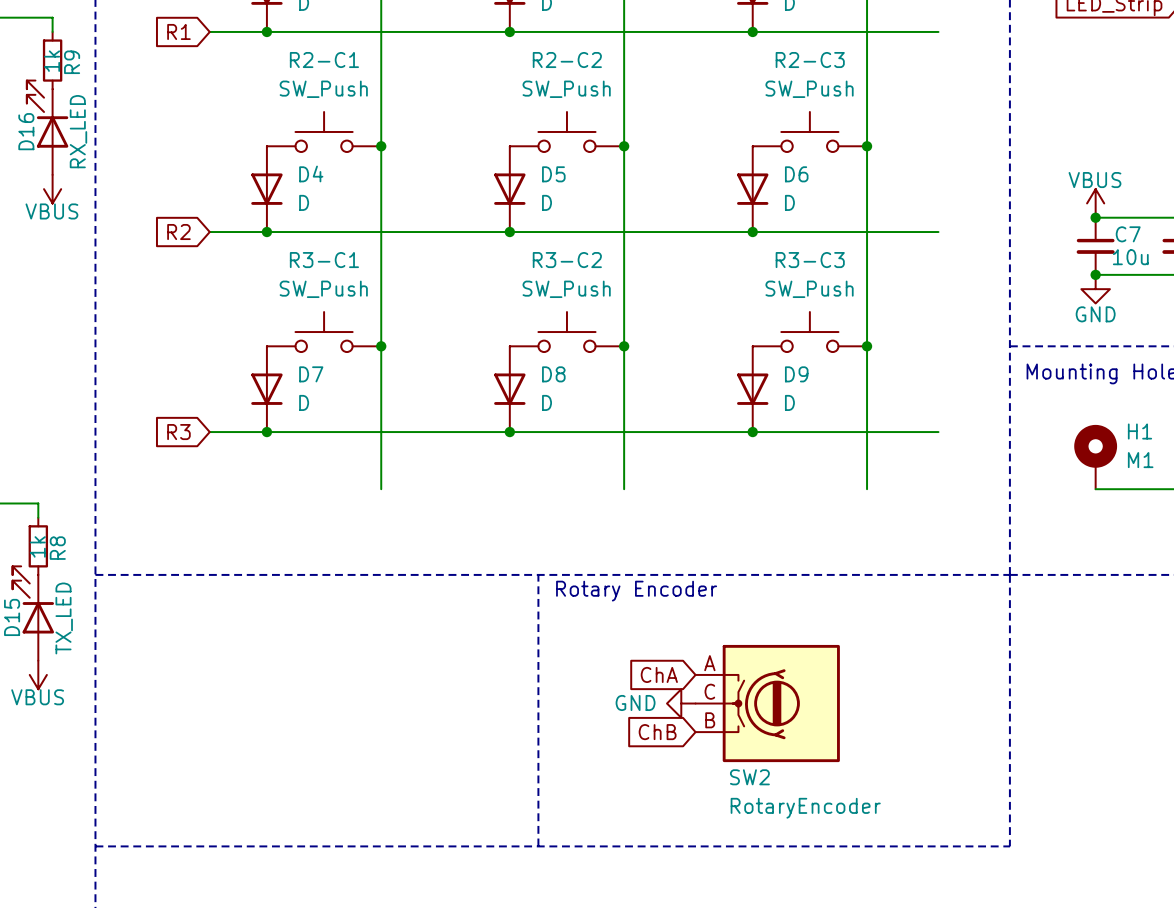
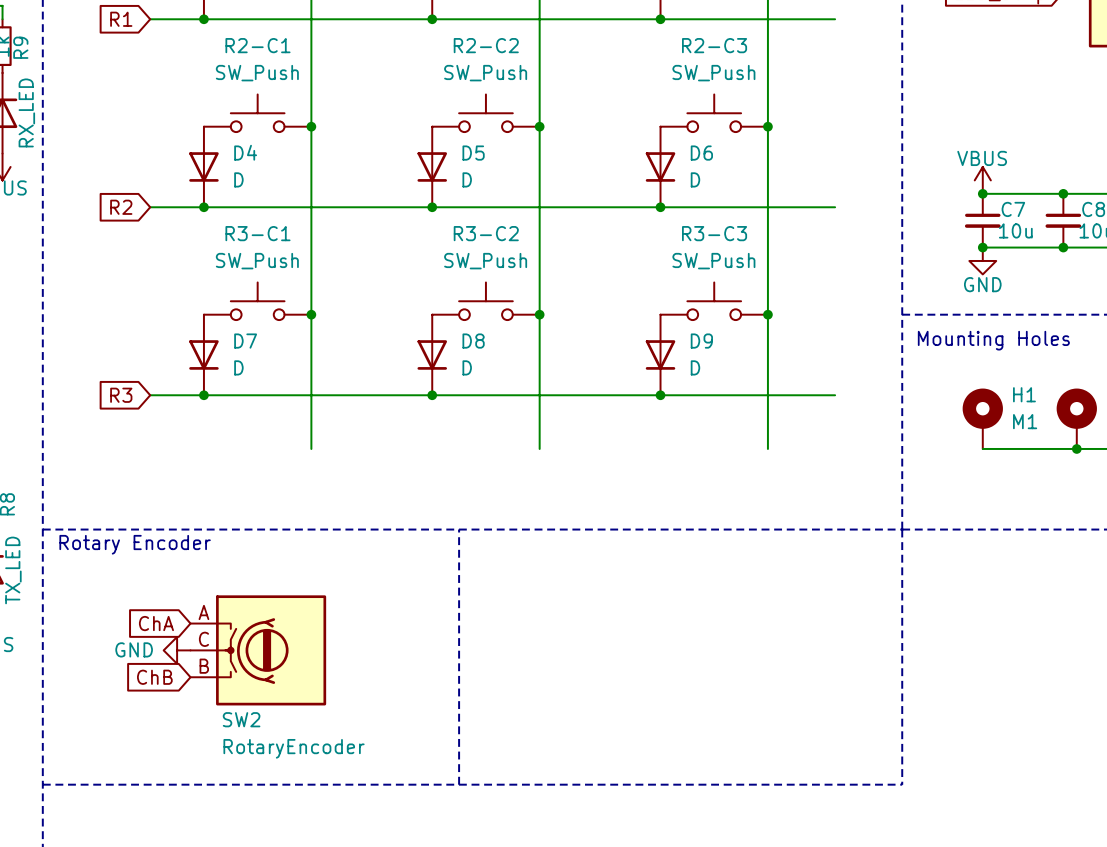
text: none -> Rotary Encoder (135, 544)
text: Rotary Encoder (636, 591) -> none
global label: none -> ChA (156, 623)
global label: ChA (659, 674) -> none
power symbol: none -> GND (177, 650)
power symbol: GND (681, 703) -> none
SW2 position: (767, 703) -> (258, 650)
global label: none -> ChB (154, 677)
global label: ChB (657, 732) -> none

